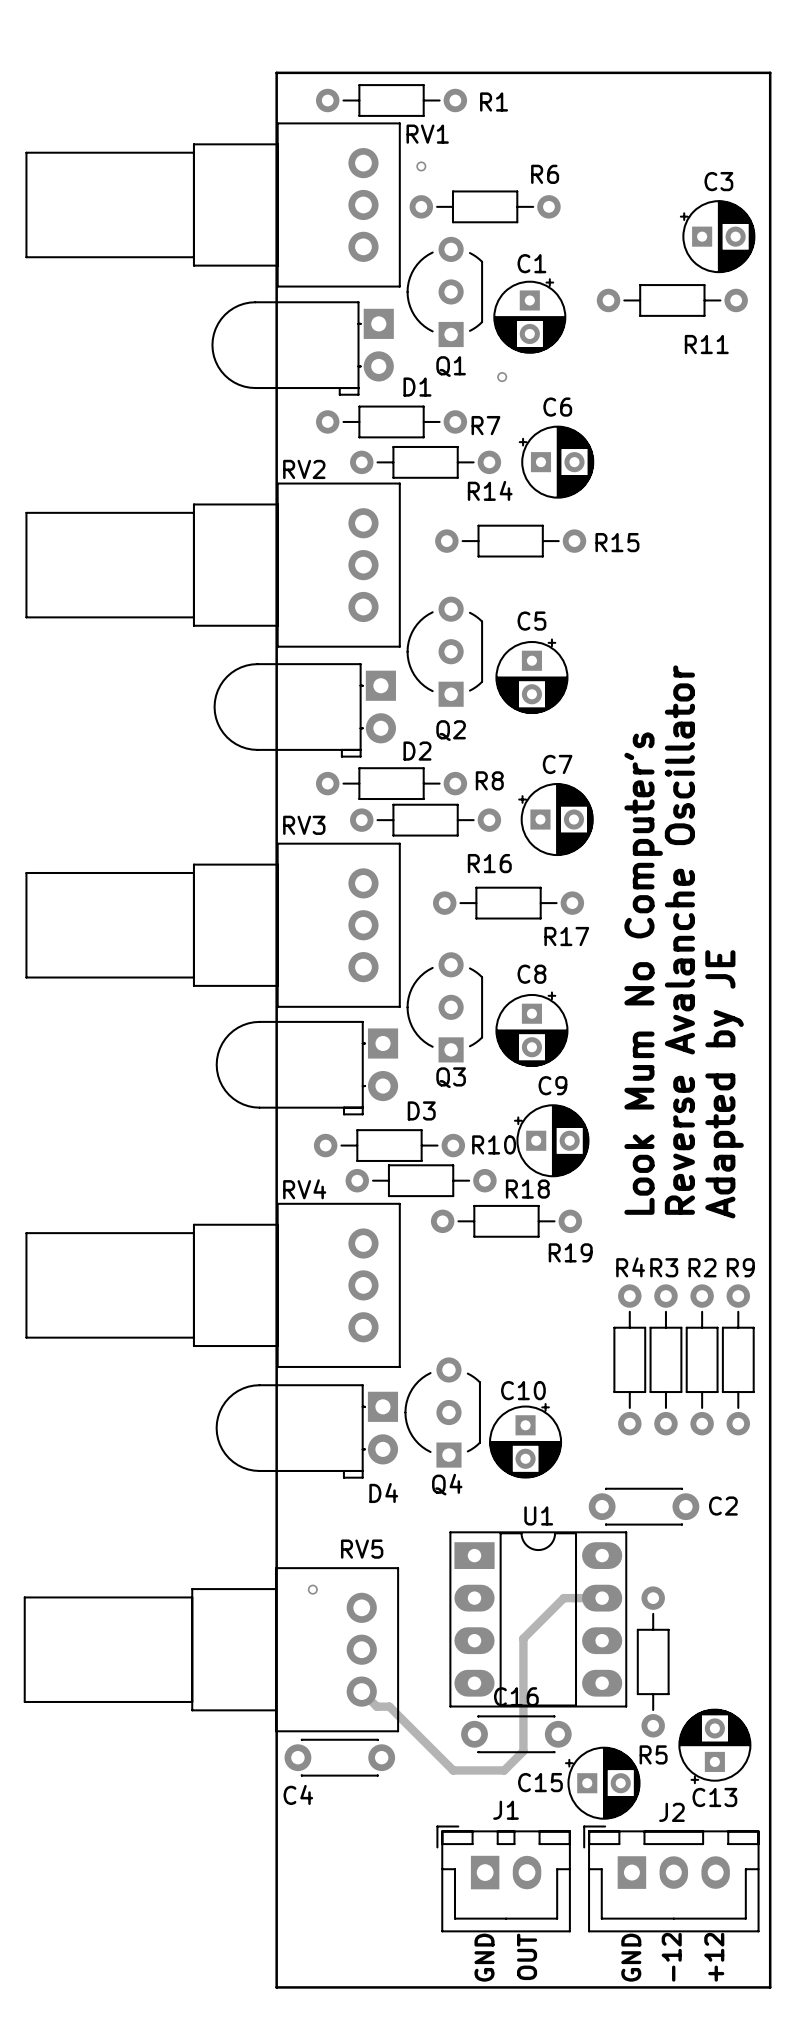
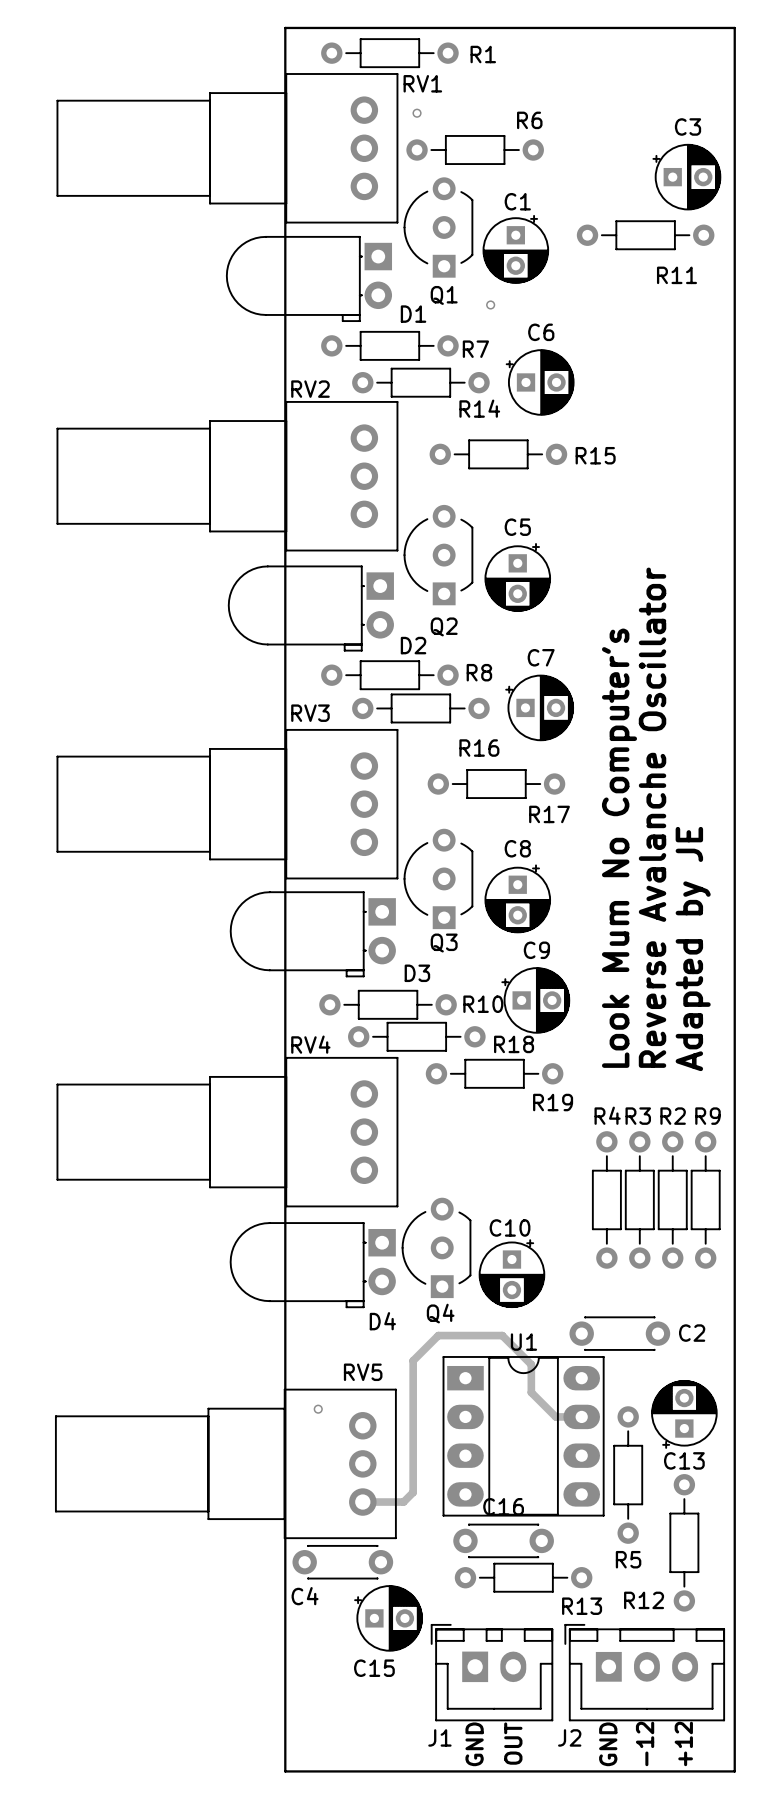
track: (573, 1598) (563, 1598) (523, 1638) (523, 1751) (504, 1770) (453, 1770) (389, 1706) (376, 1706) (361, 1691) -> (555, 1416) (531, 1392) (531, 1364) (502, 1335) (438, 1335) (413, 1360) (413, 1492) (403, 1502) (362, 1502)
R12: none -> (684, 1542)
C13 position: (714, 1746) -> (684, 1414)
R13: none -> (523, 1577)
C15 name position: C15 (540, 1782) -> C15 (374, 1668)
C15 position: (602, 1783) -> (388, 1618)
J1 name position: J1 (506, 1810) -> J1 (439, 1737)
J2 name position: J2 (671, 1812) -> J2 (569, 1737)

